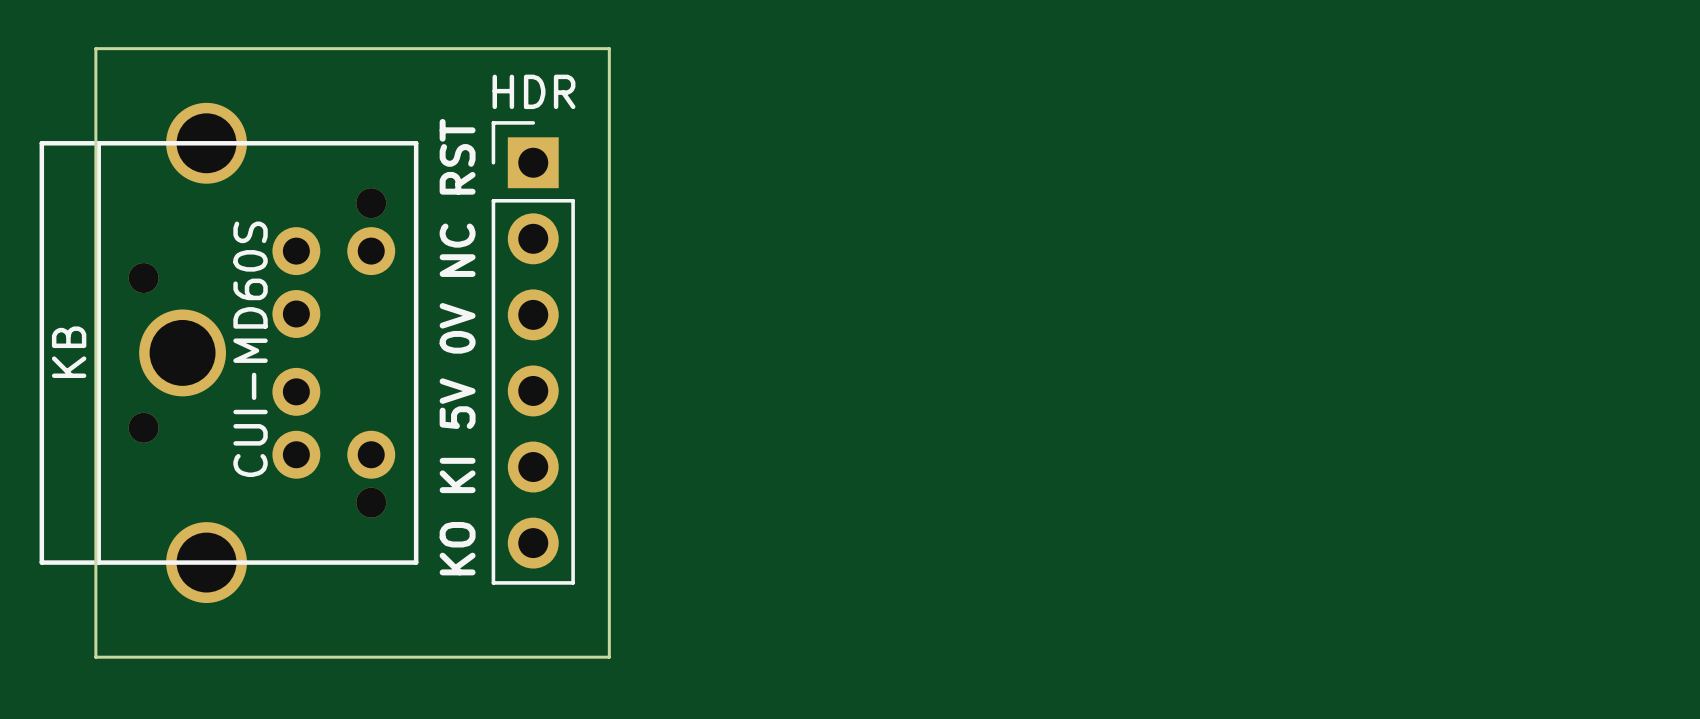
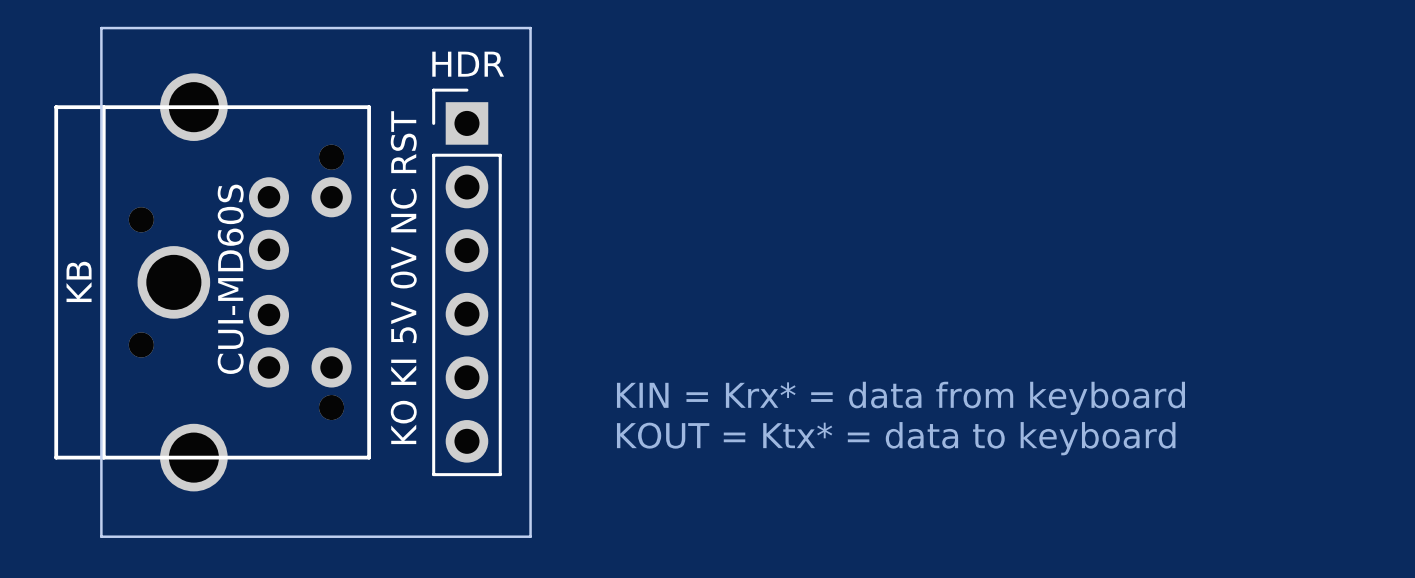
text: none -> KIN = Krx* = data from keyboard (900, 398)
text: none -> KOUT = Ktx* = data to keyboard (896, 438)

